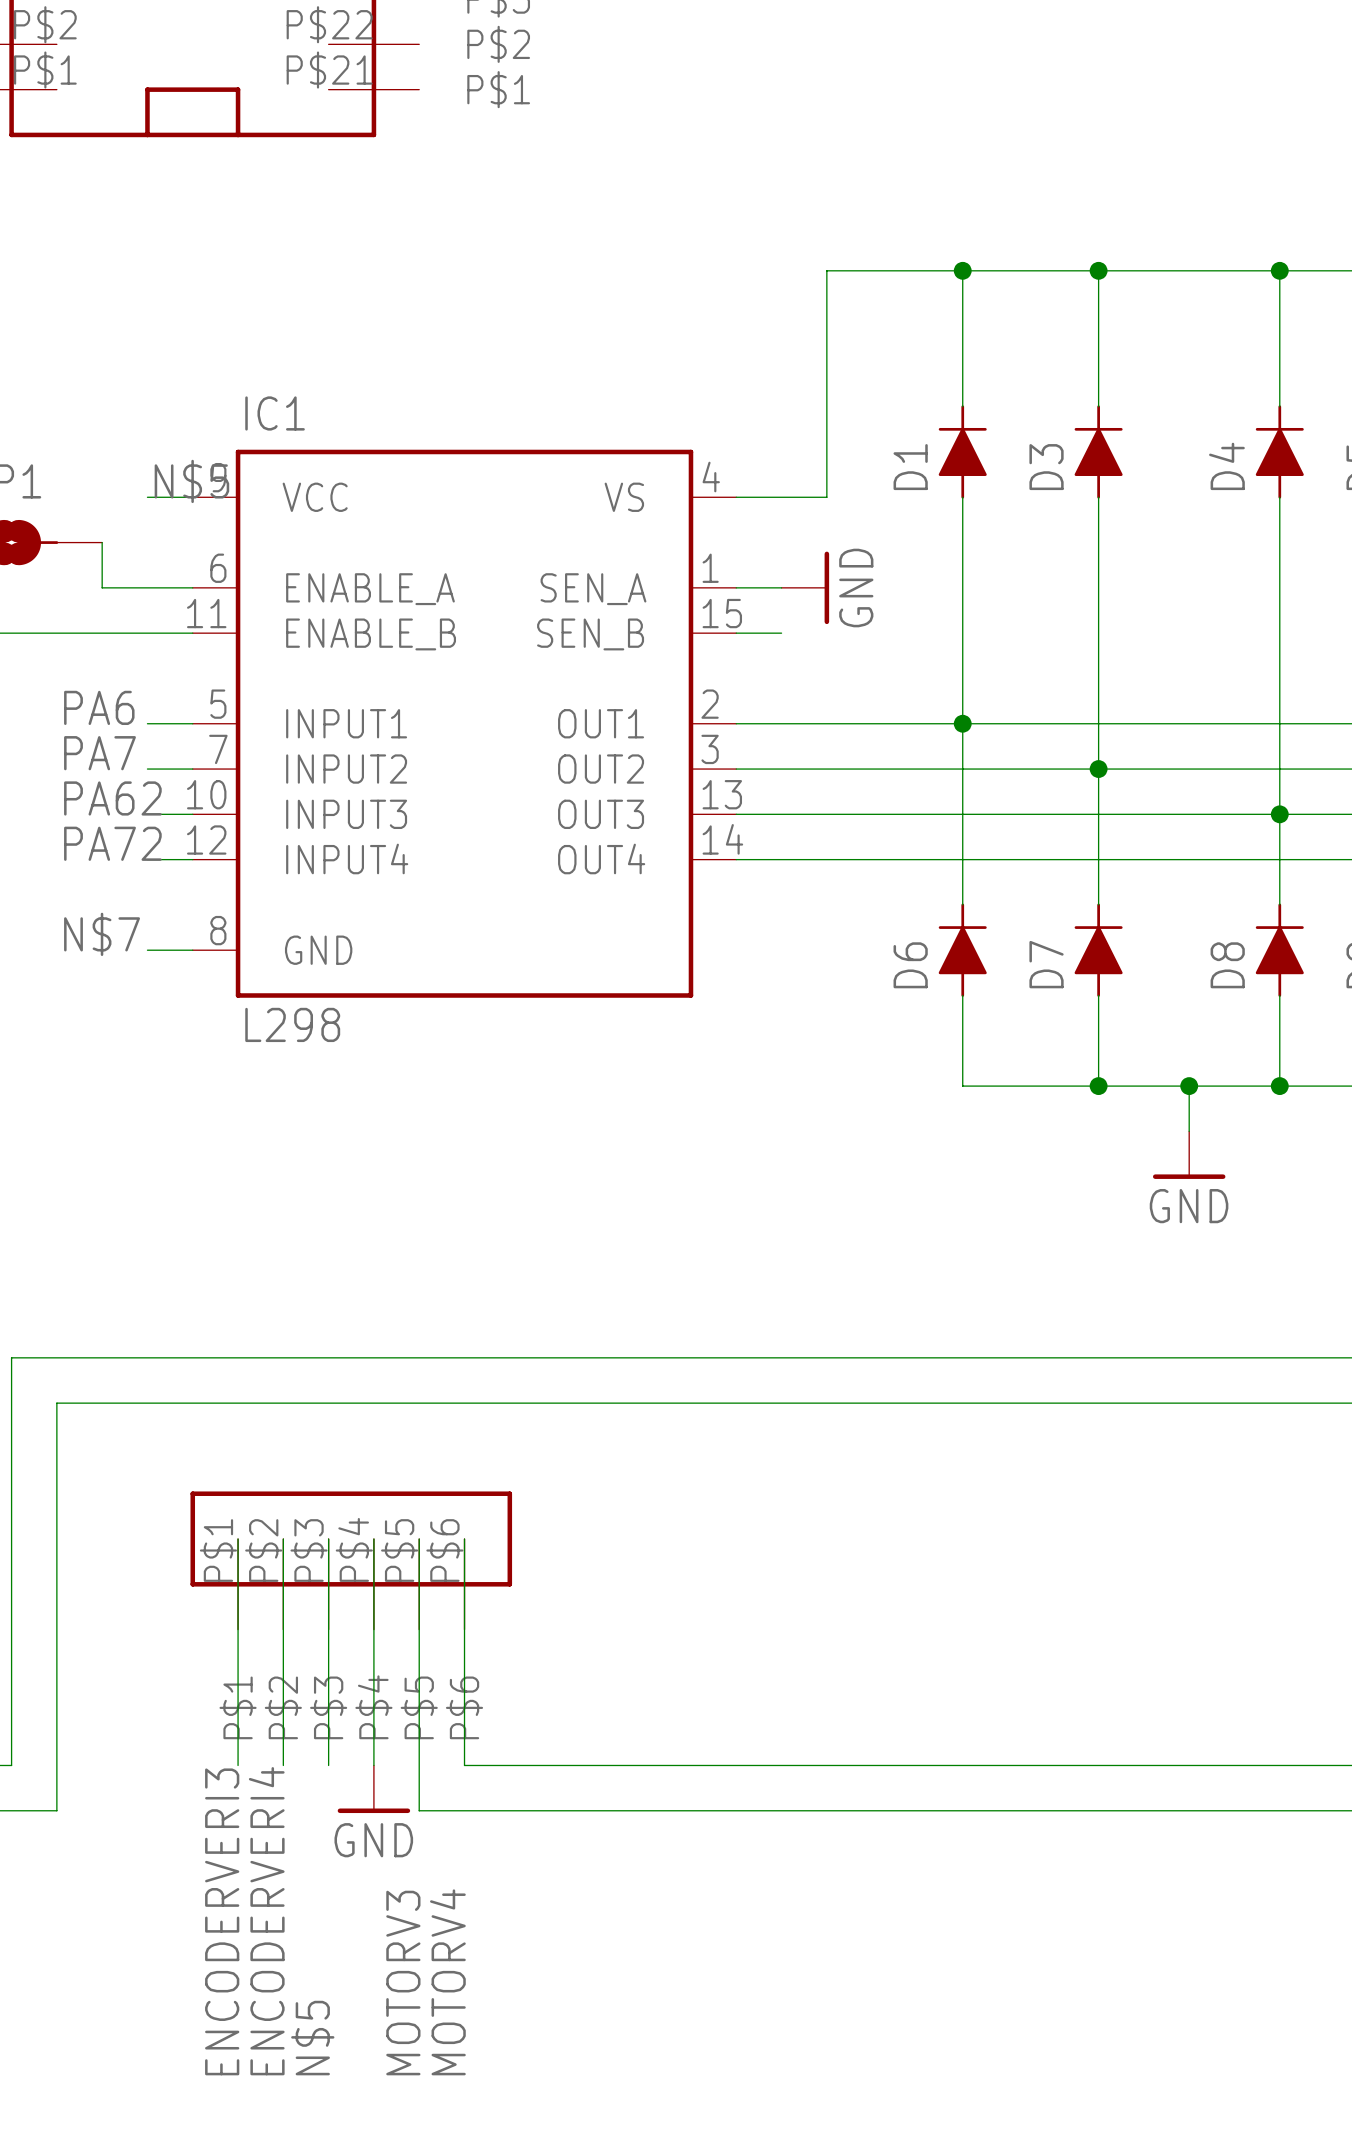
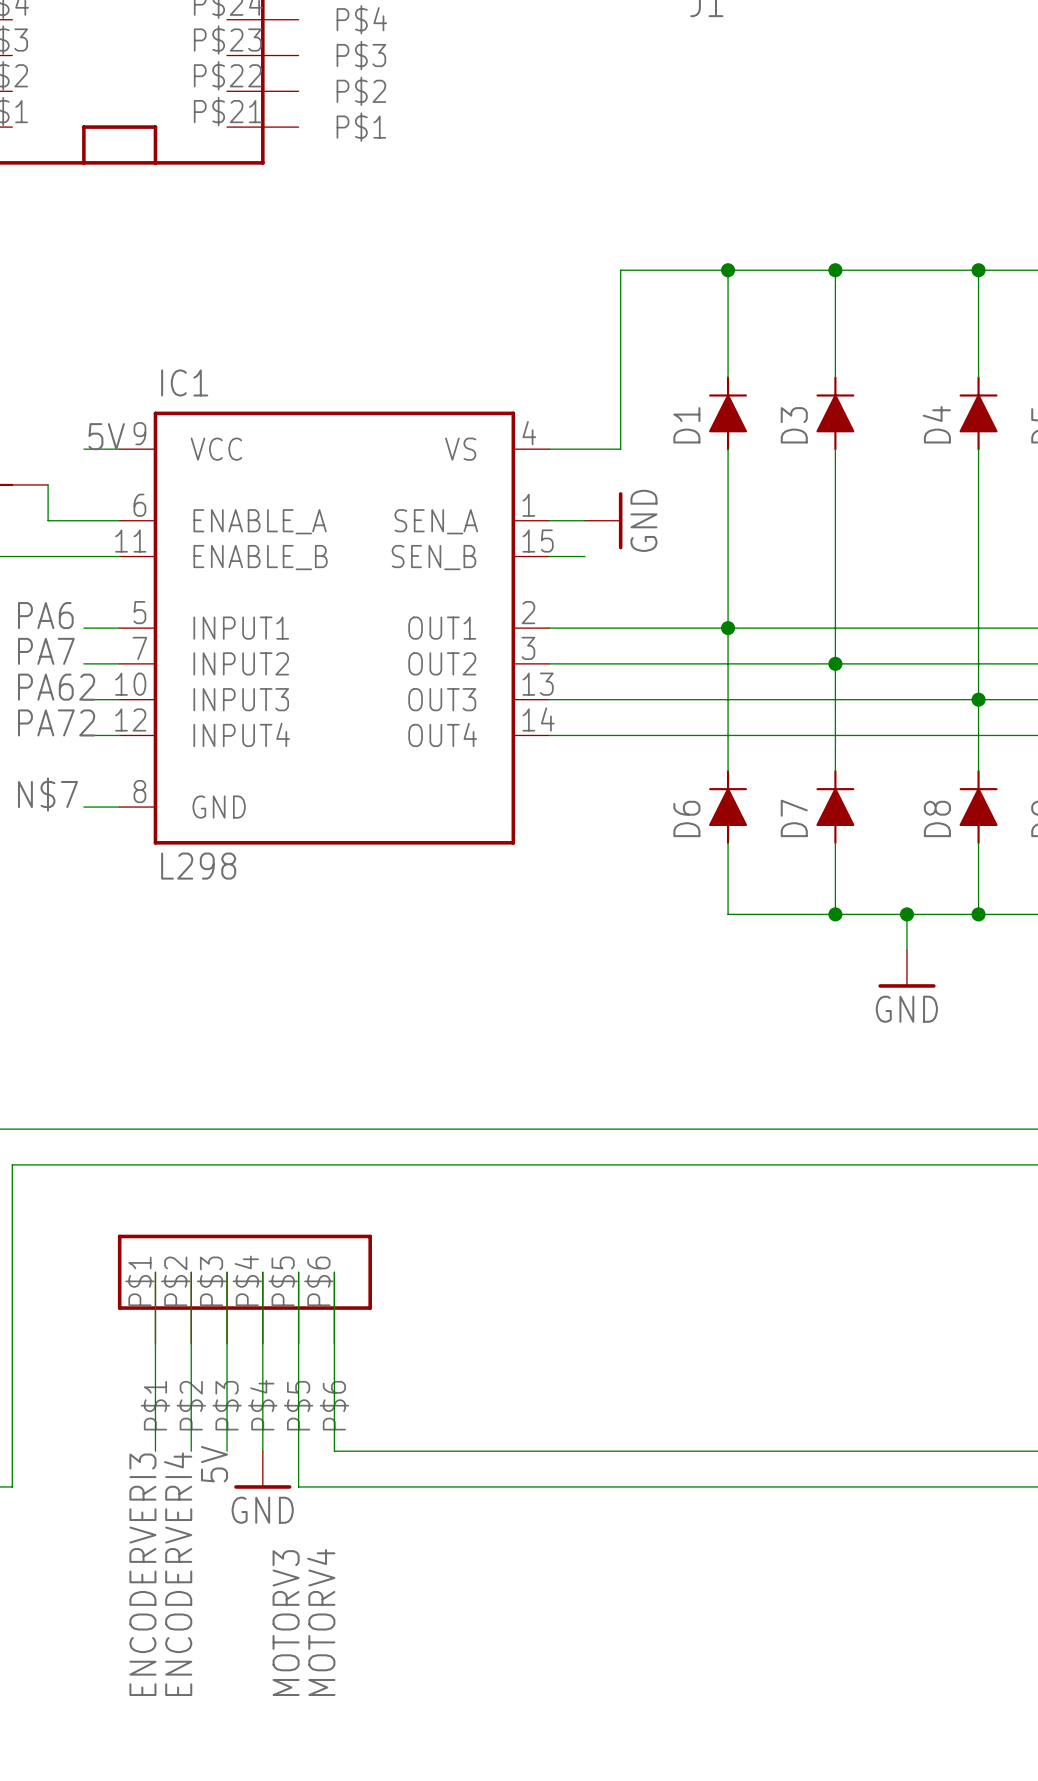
label: N$5 (191, 481) -> 5V (106, 436)
label: none -> 5V (214, 1464)
label: N$5 (312, 2038) -> none

